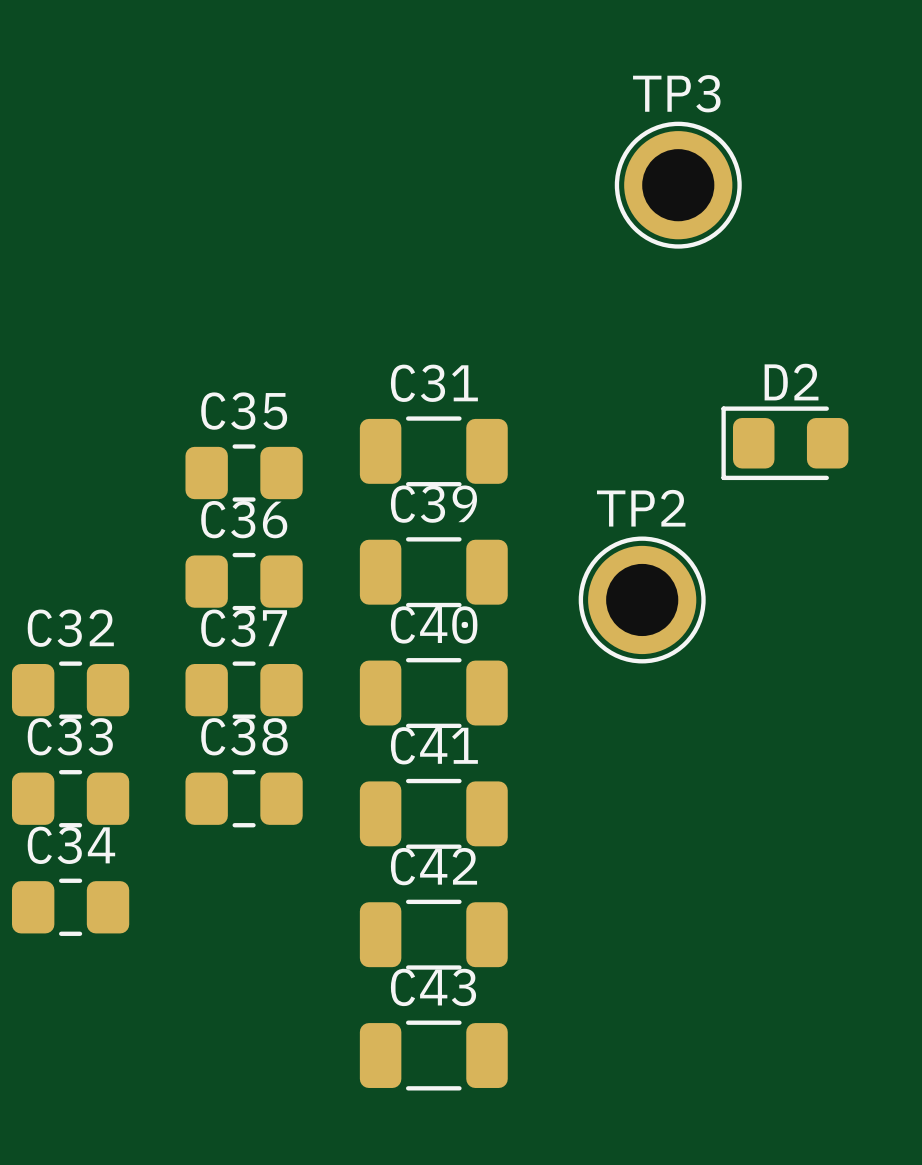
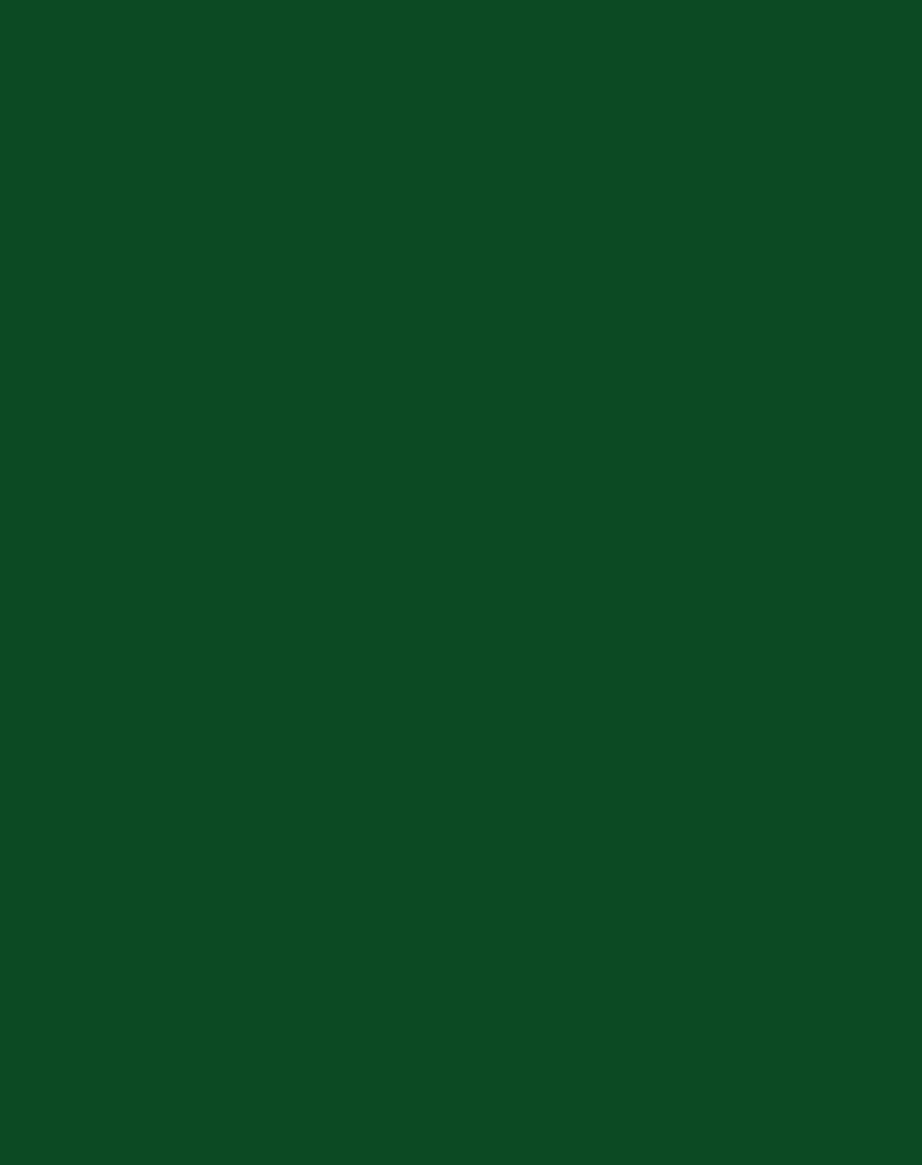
TP3: (678, 185) -> none
D2: (784, 443) -> none
C31: (433, 451) -> none
C35: (244, 473) -> none
C39: (433, 572) -> none
C36: (244, 581) -> none
TP2: (642, 599) -> none
C32: (70, 690) -> none
C37: (244, 690) -> none
C40: (433, 693) -> none
C33: (70, 798) -> none
C38: (244, 798) -> none
C41: (433, 813) -> none
C34: (70, 907) -> none
C42: (433, 934) -> none
C43: (433, 1055) -> none

